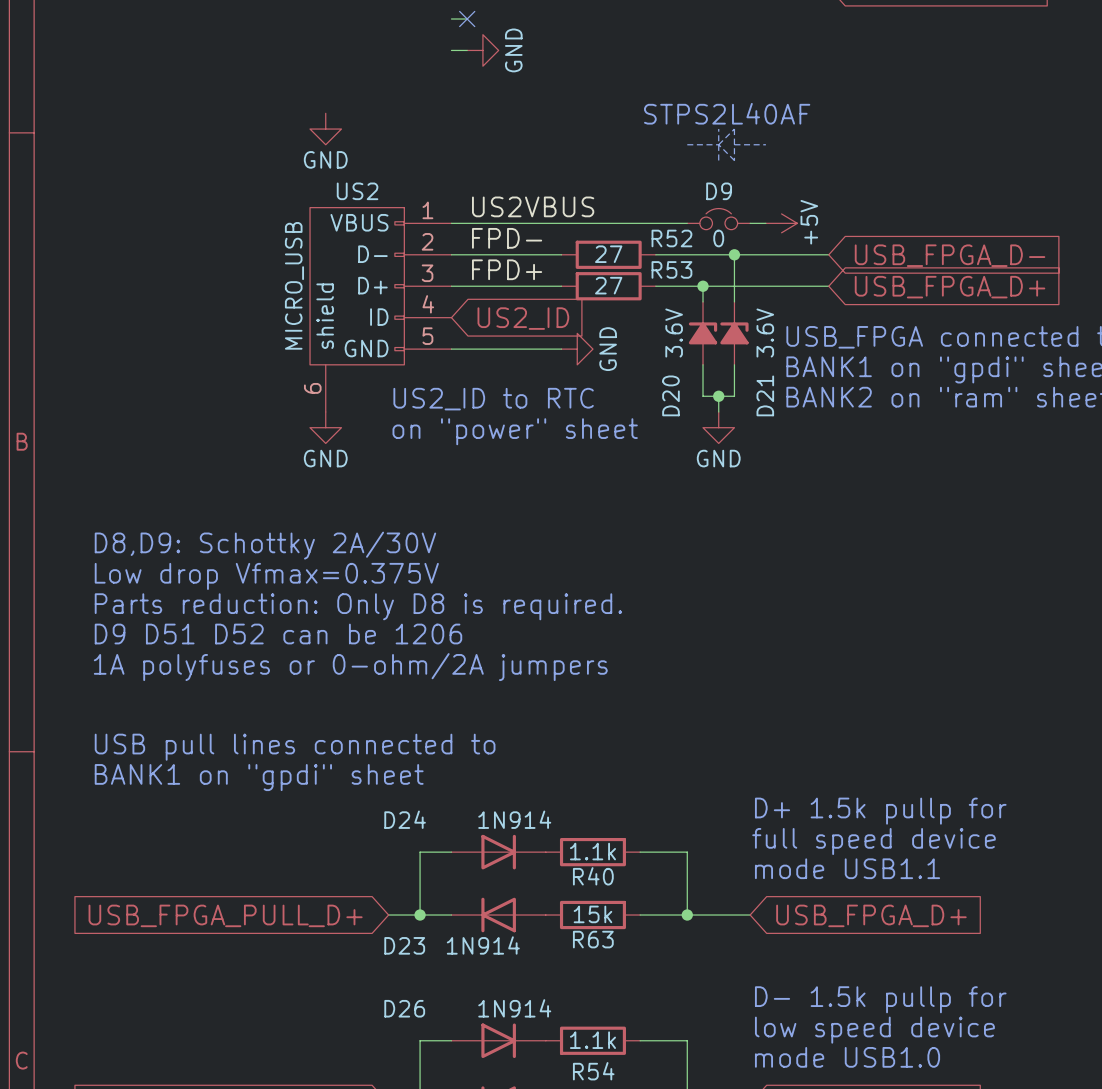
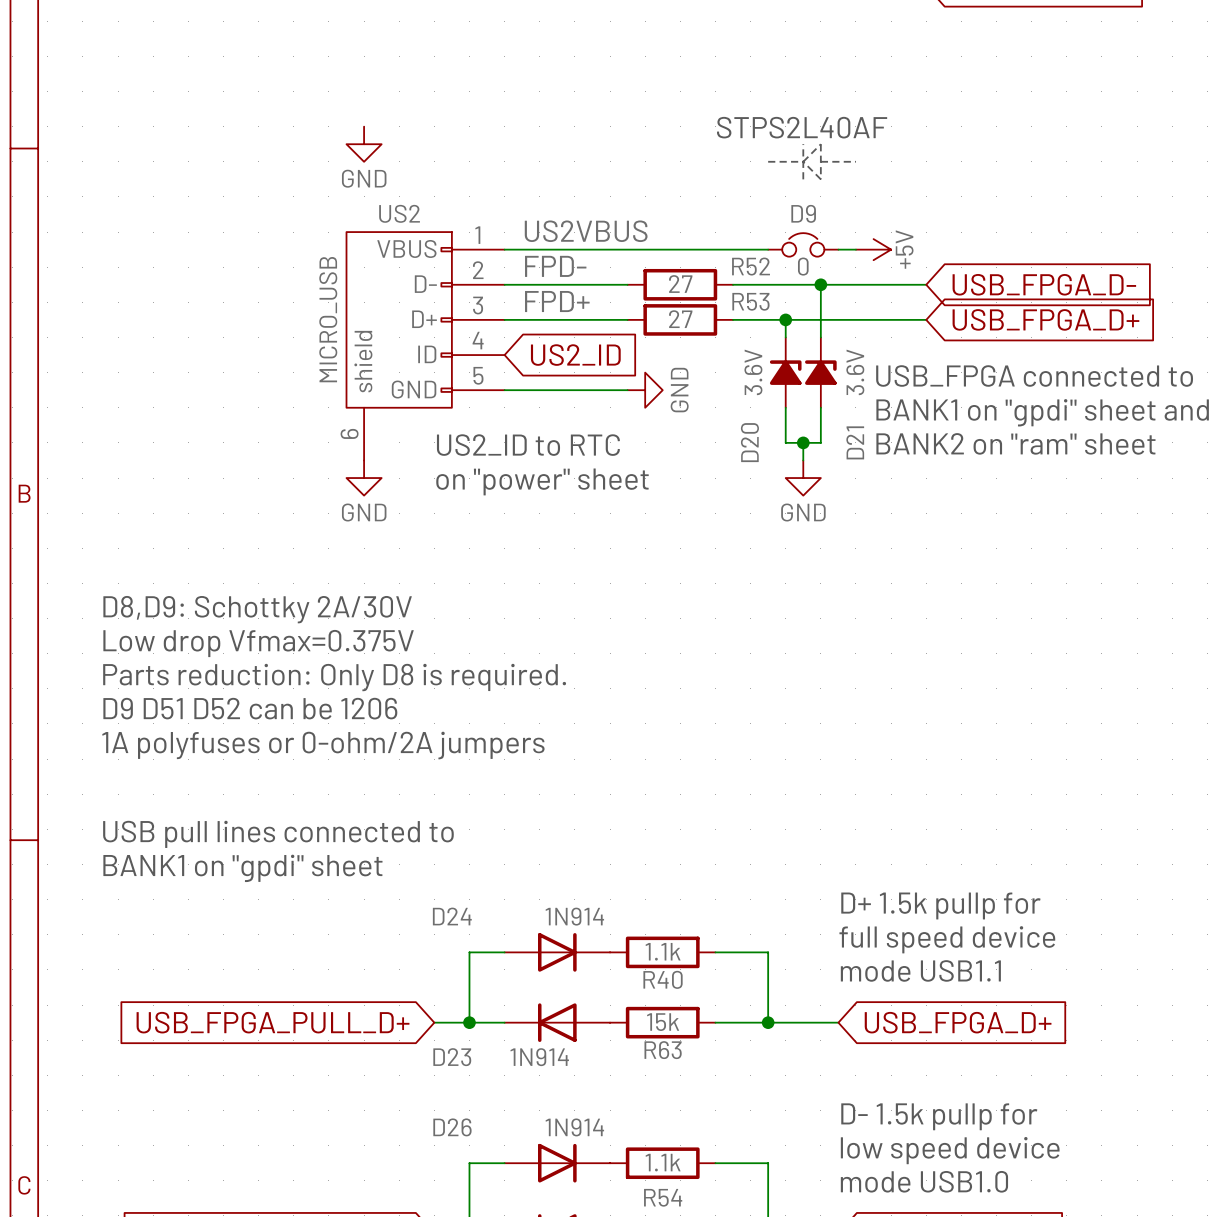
wire: (451, 19) (467, 19) -> none
no-connect mark: (467, 19) -> none
wire: (451, 50) (467, 50) -> none
power symbol: GND (482, 50) -> none

